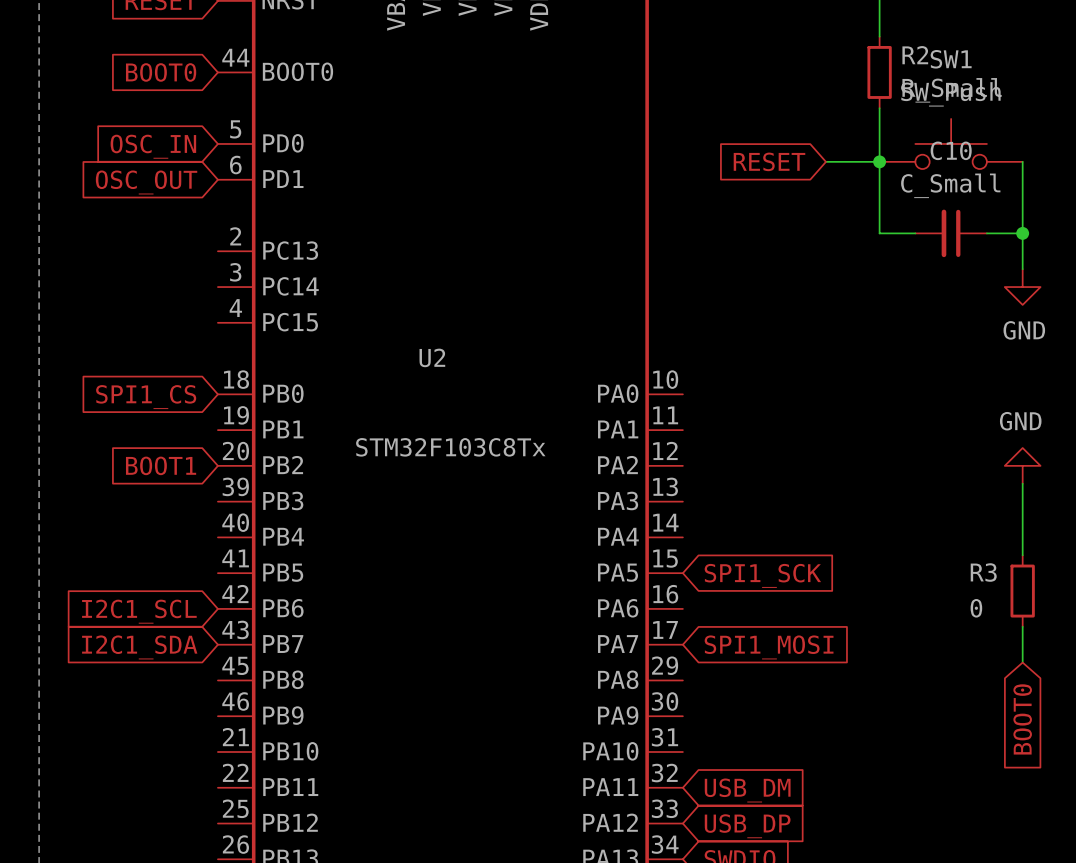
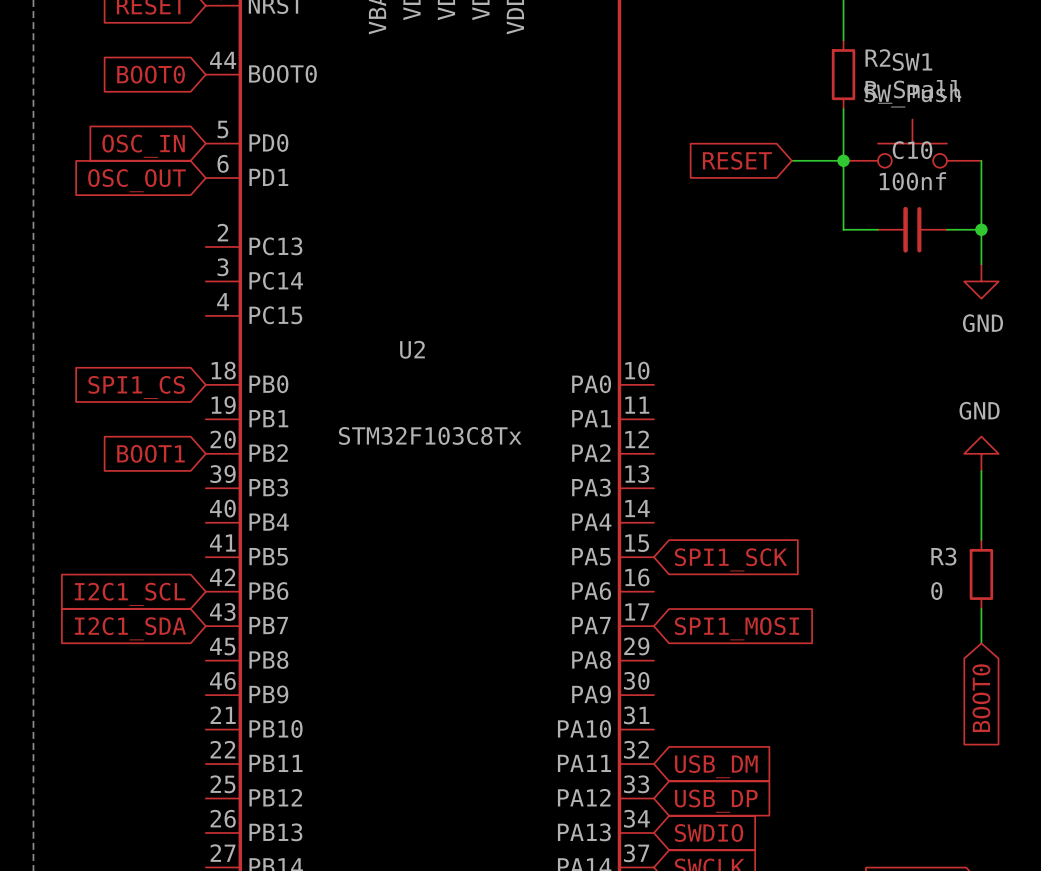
C10 value: C_Small (950, 185) -> 100nf (912, 181)

